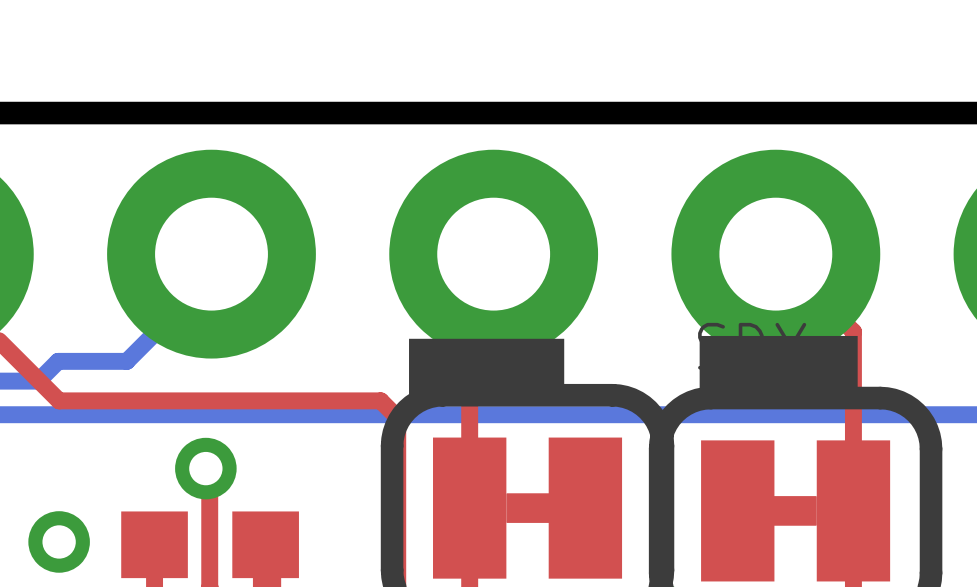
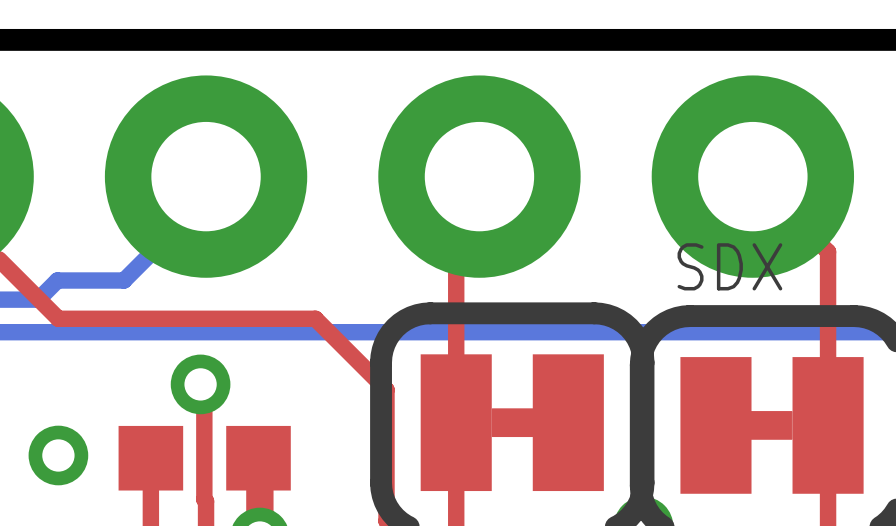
drawing: [699, 335, 858, 396] -> none
drawing: [409, 338, 565, 396] -> none
top track: (324, 400) (380, 400) (397, 417) (397, 474) -> (315, 318) (386, 389)

